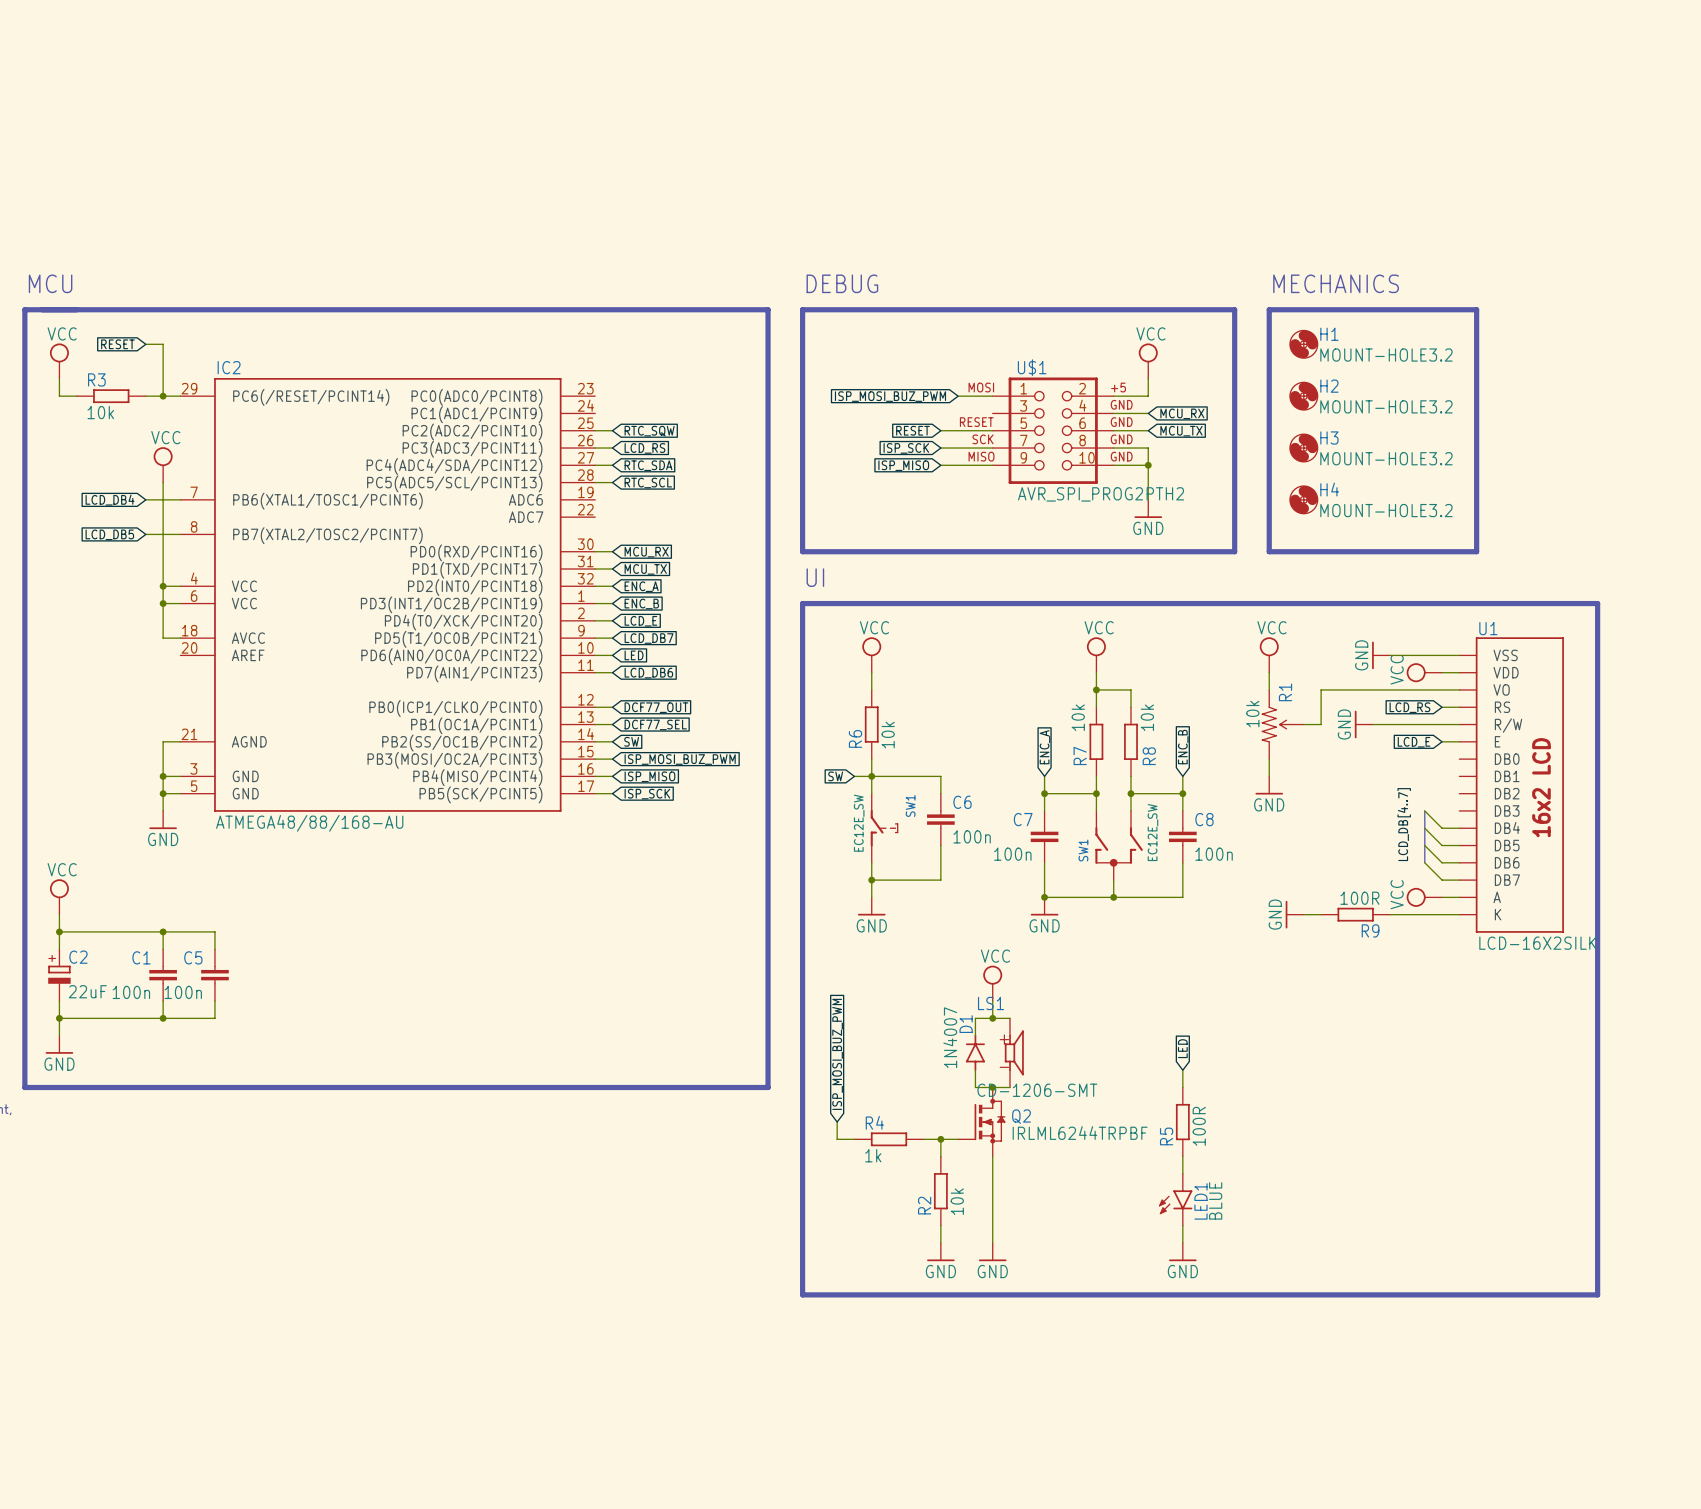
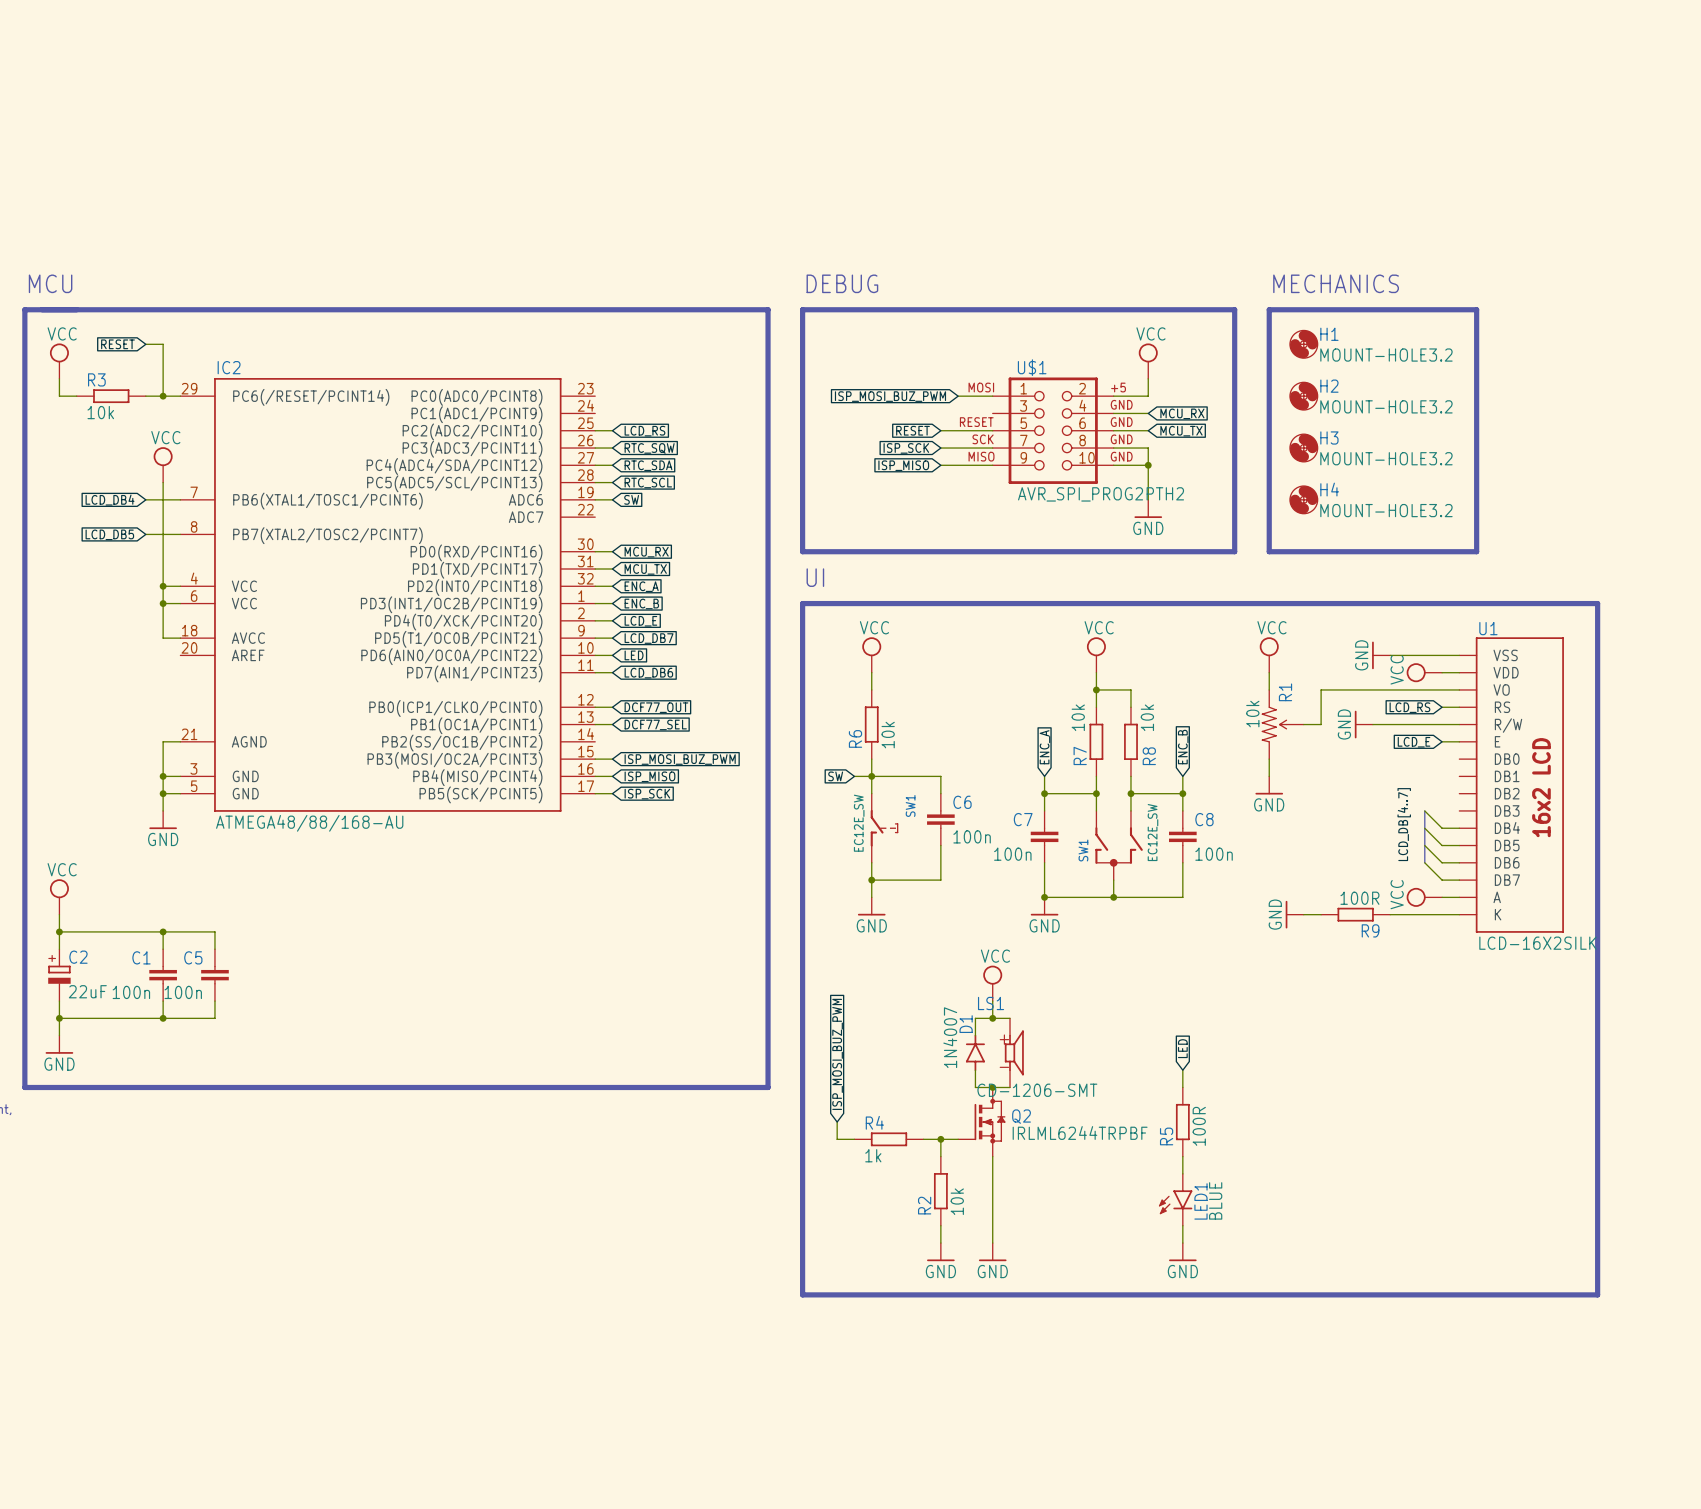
global label: RTC_SQW (649, 431) -> LCD_RS (644, 431)
global label: LCD_RS (644, 448) -> RTC_SQW (649, 448)
wire: none -> (595, 499) (612, 499)
global label: none -> SW (631, 499)
wire: (595, 741) (612, 741) -> none
global label: SW (631, 741) -> none

